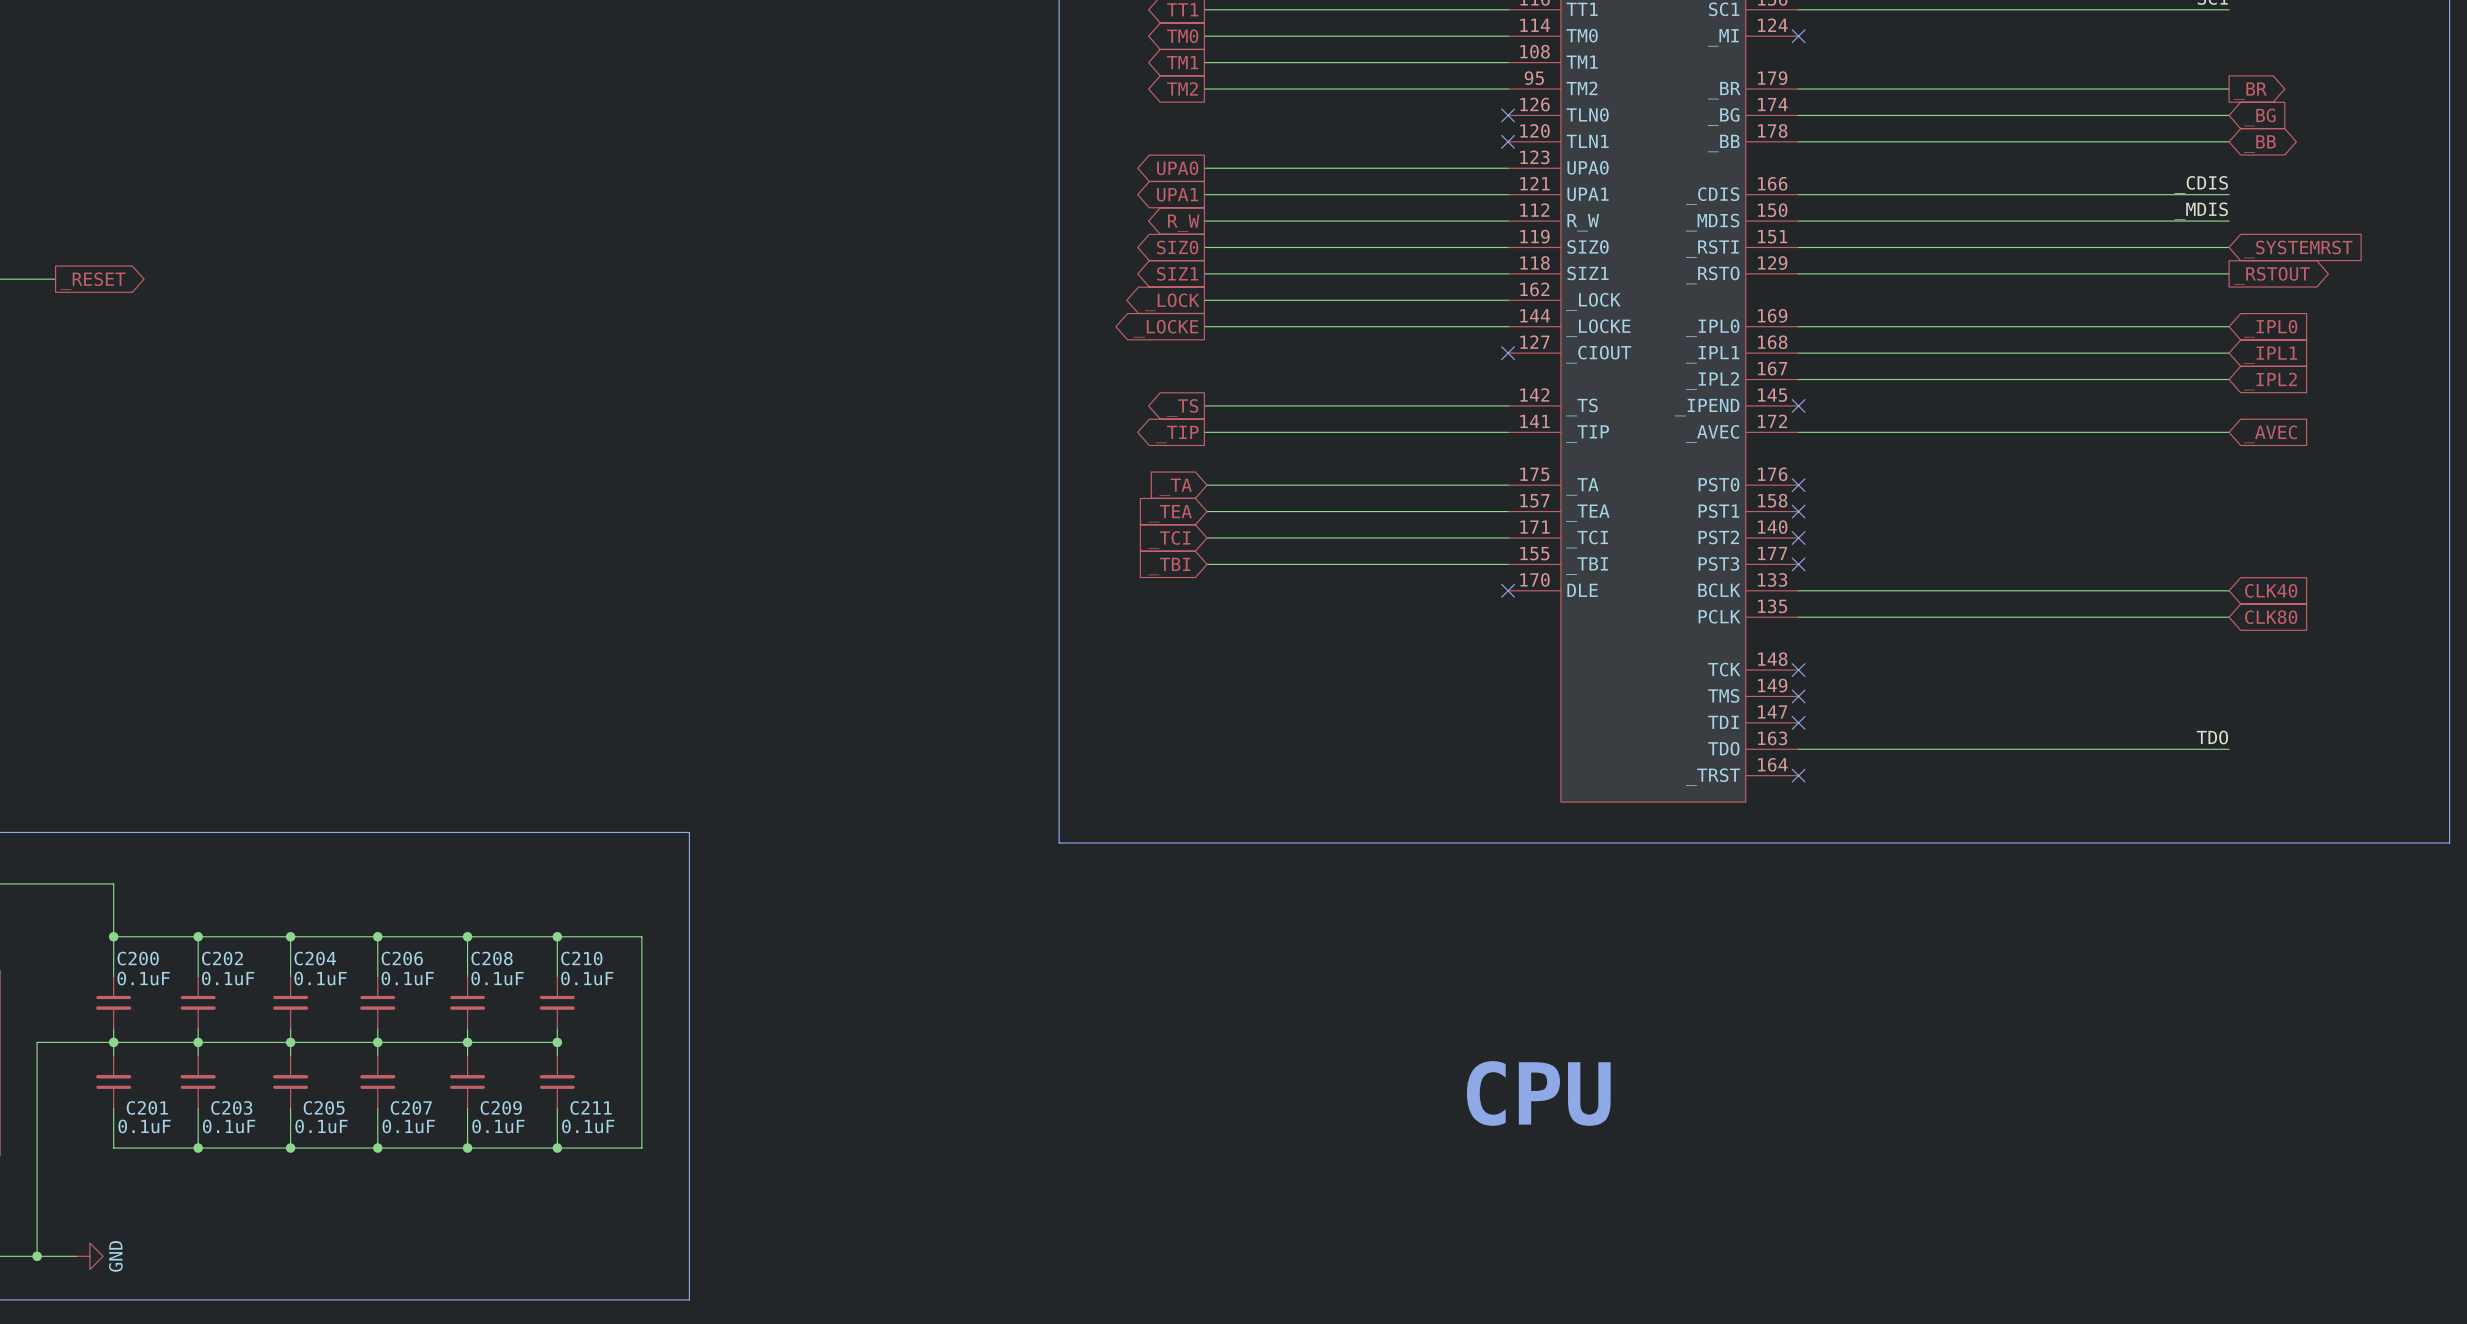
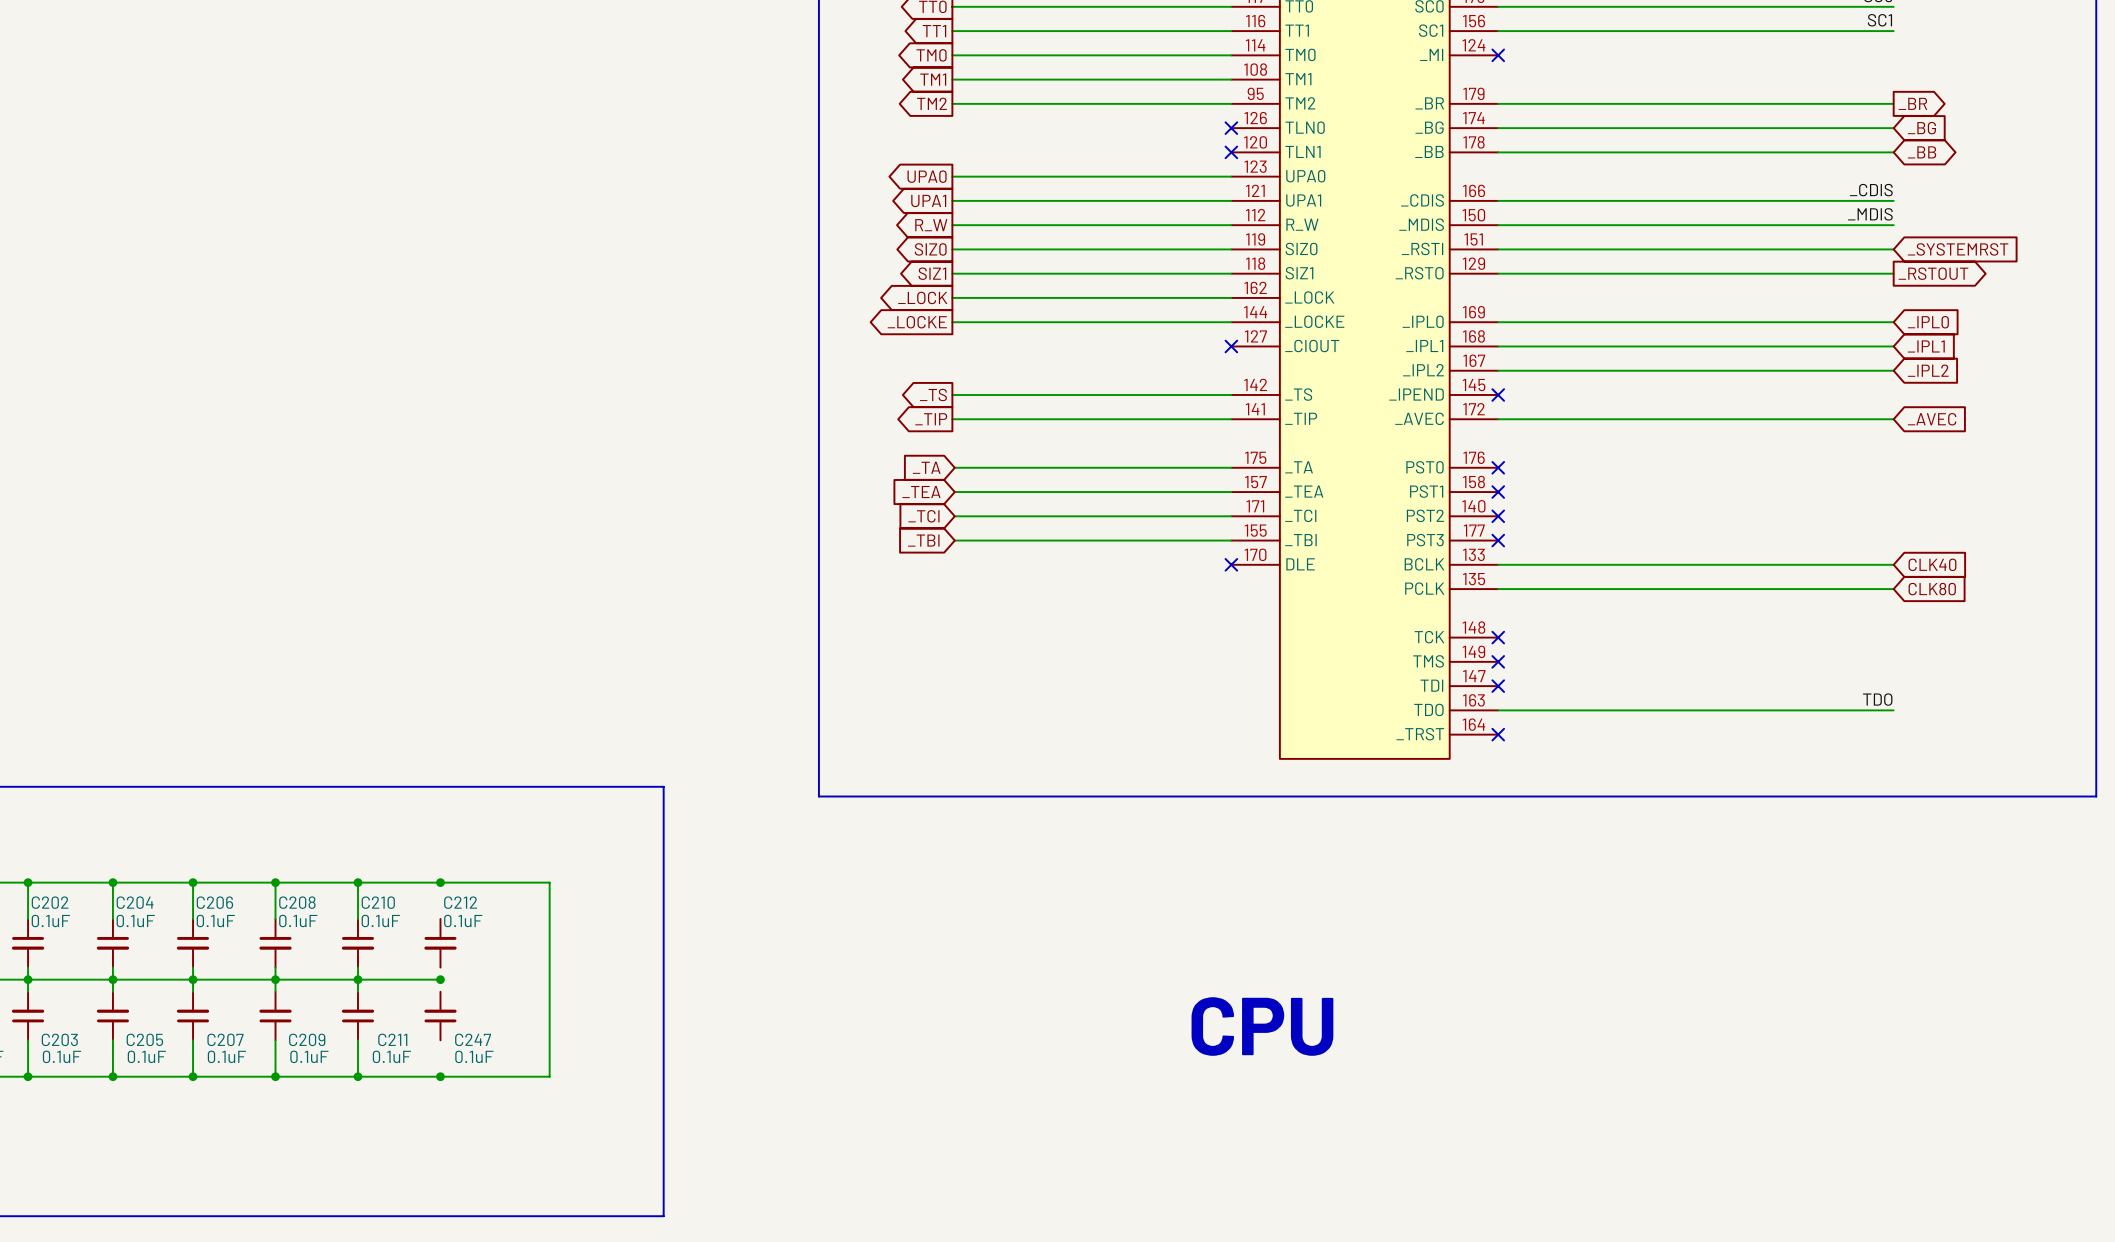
line: (689, 832) (689, 1299) -> (479, 786) (663, 786) (663, 1216) (479, 1216)
wire: (641, 936) (641, 1148) -> (435, 882) (549, 882) (549, 1076) (435, 1076)
junction: none -> (440, 882)
C212: none -> 0.1uF (440, 943)
wire: none -> (357, 979) (440, 979)
junction: none -> (440, 979)
C247: none -> 0.1uF (440, 1016)
junction: none -> (440, 1076)

